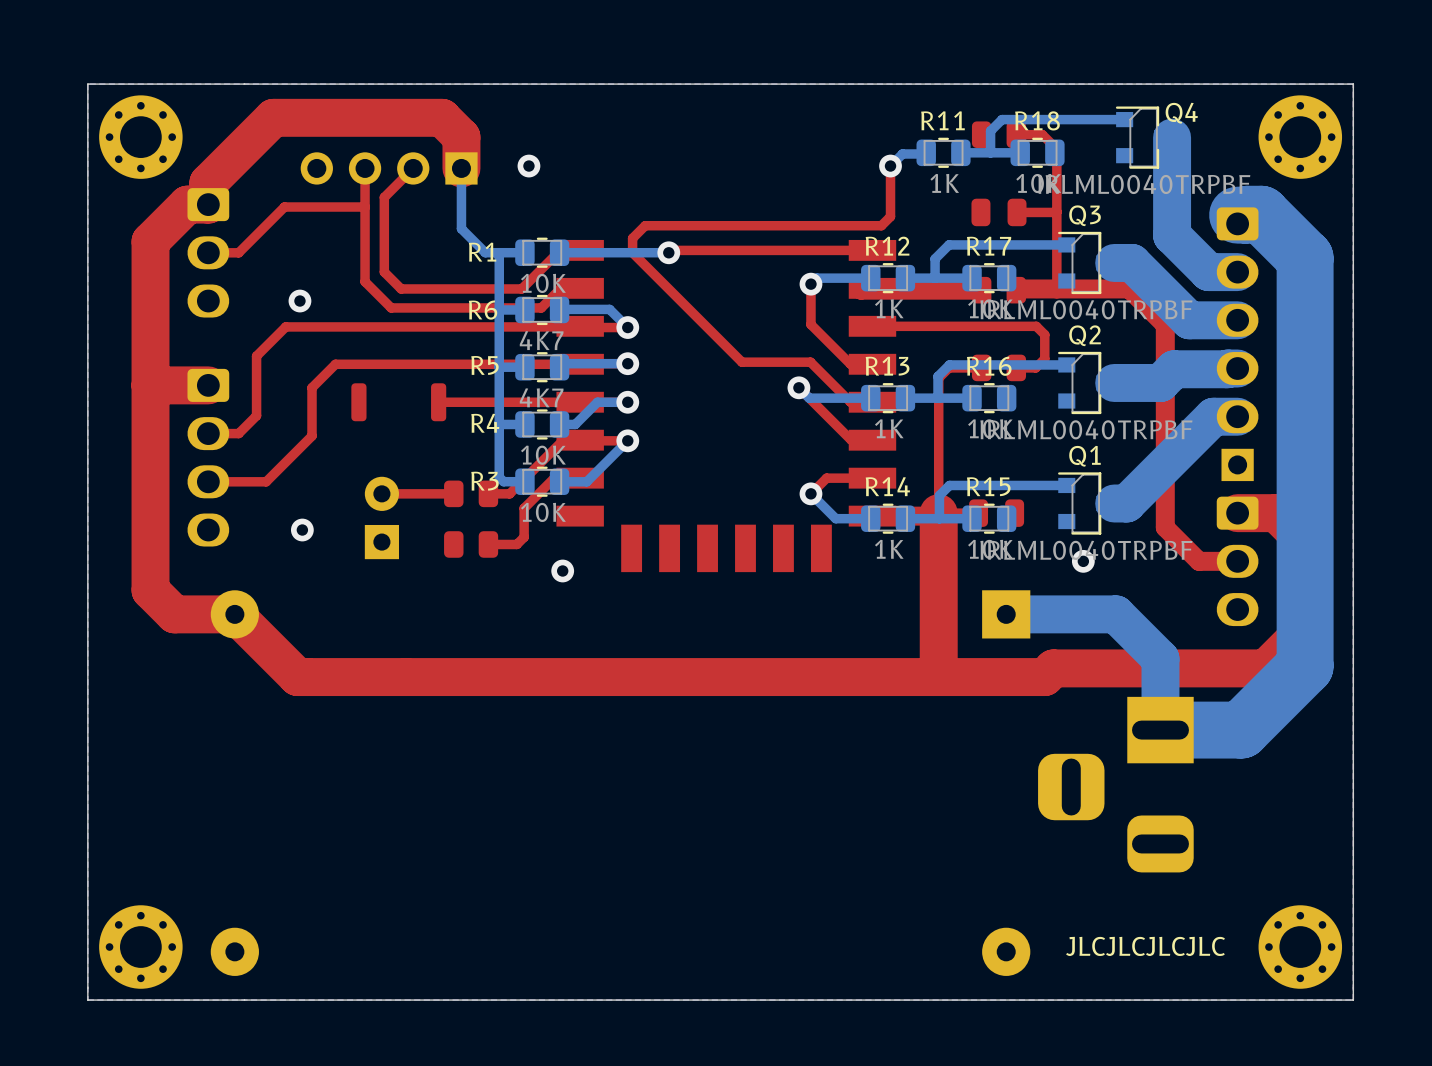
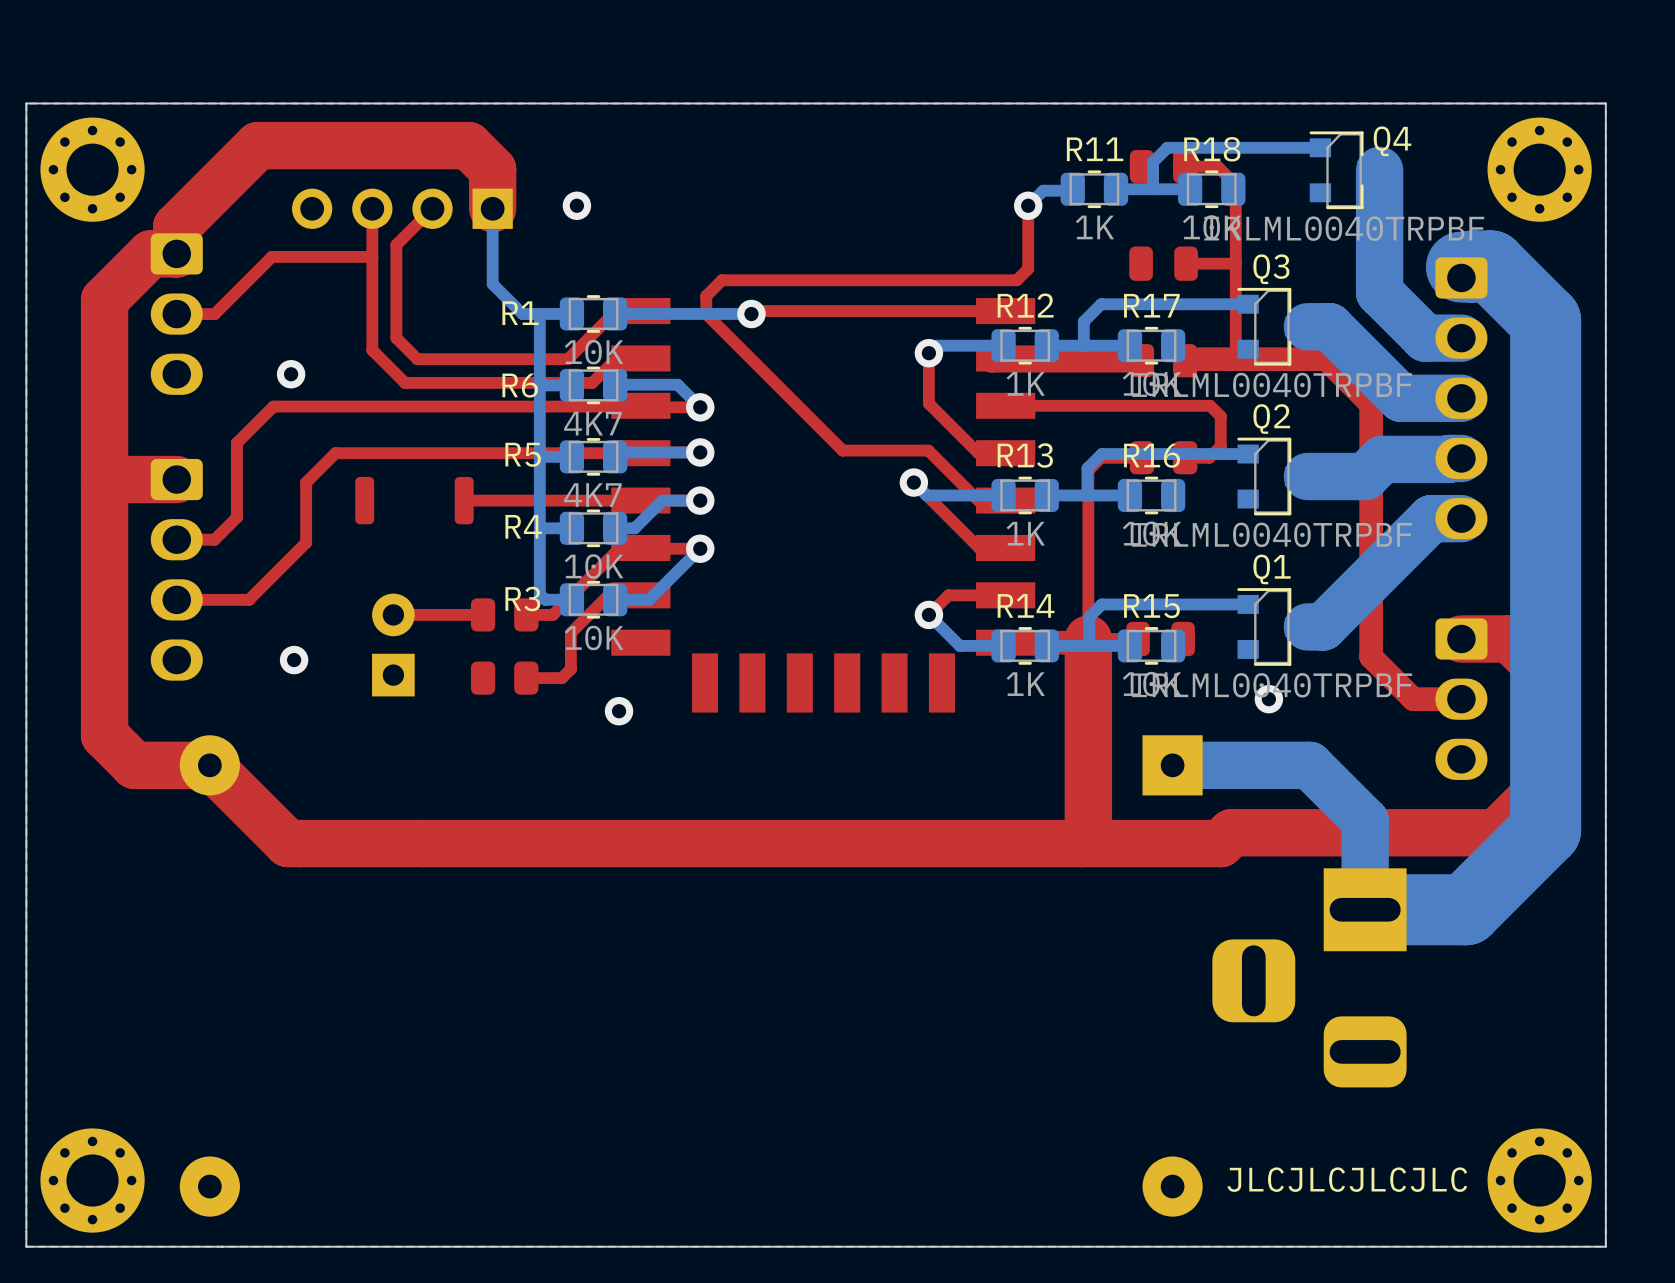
part: (1237, 464) -> none

